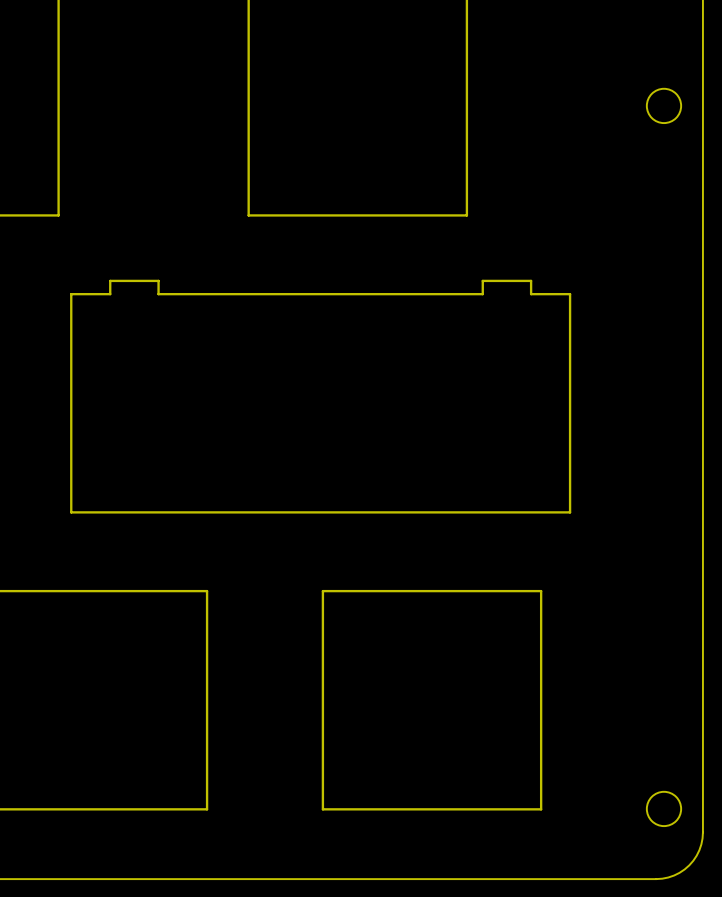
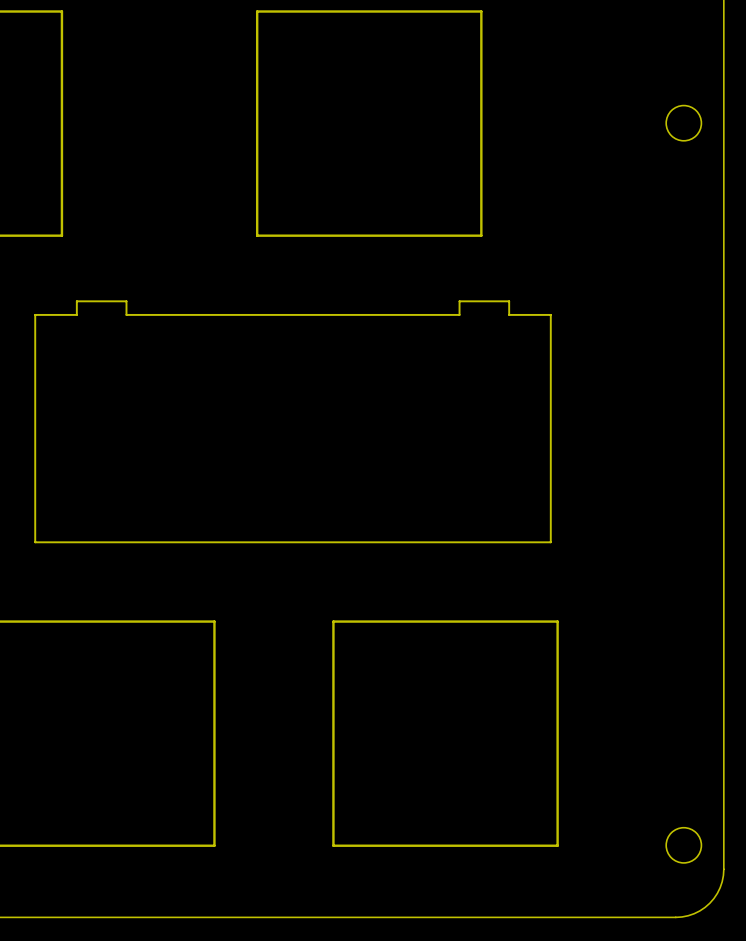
drawing: none -> [34, 300, 552, 544]
drawing: [70, 279, 572, 514] -> none

